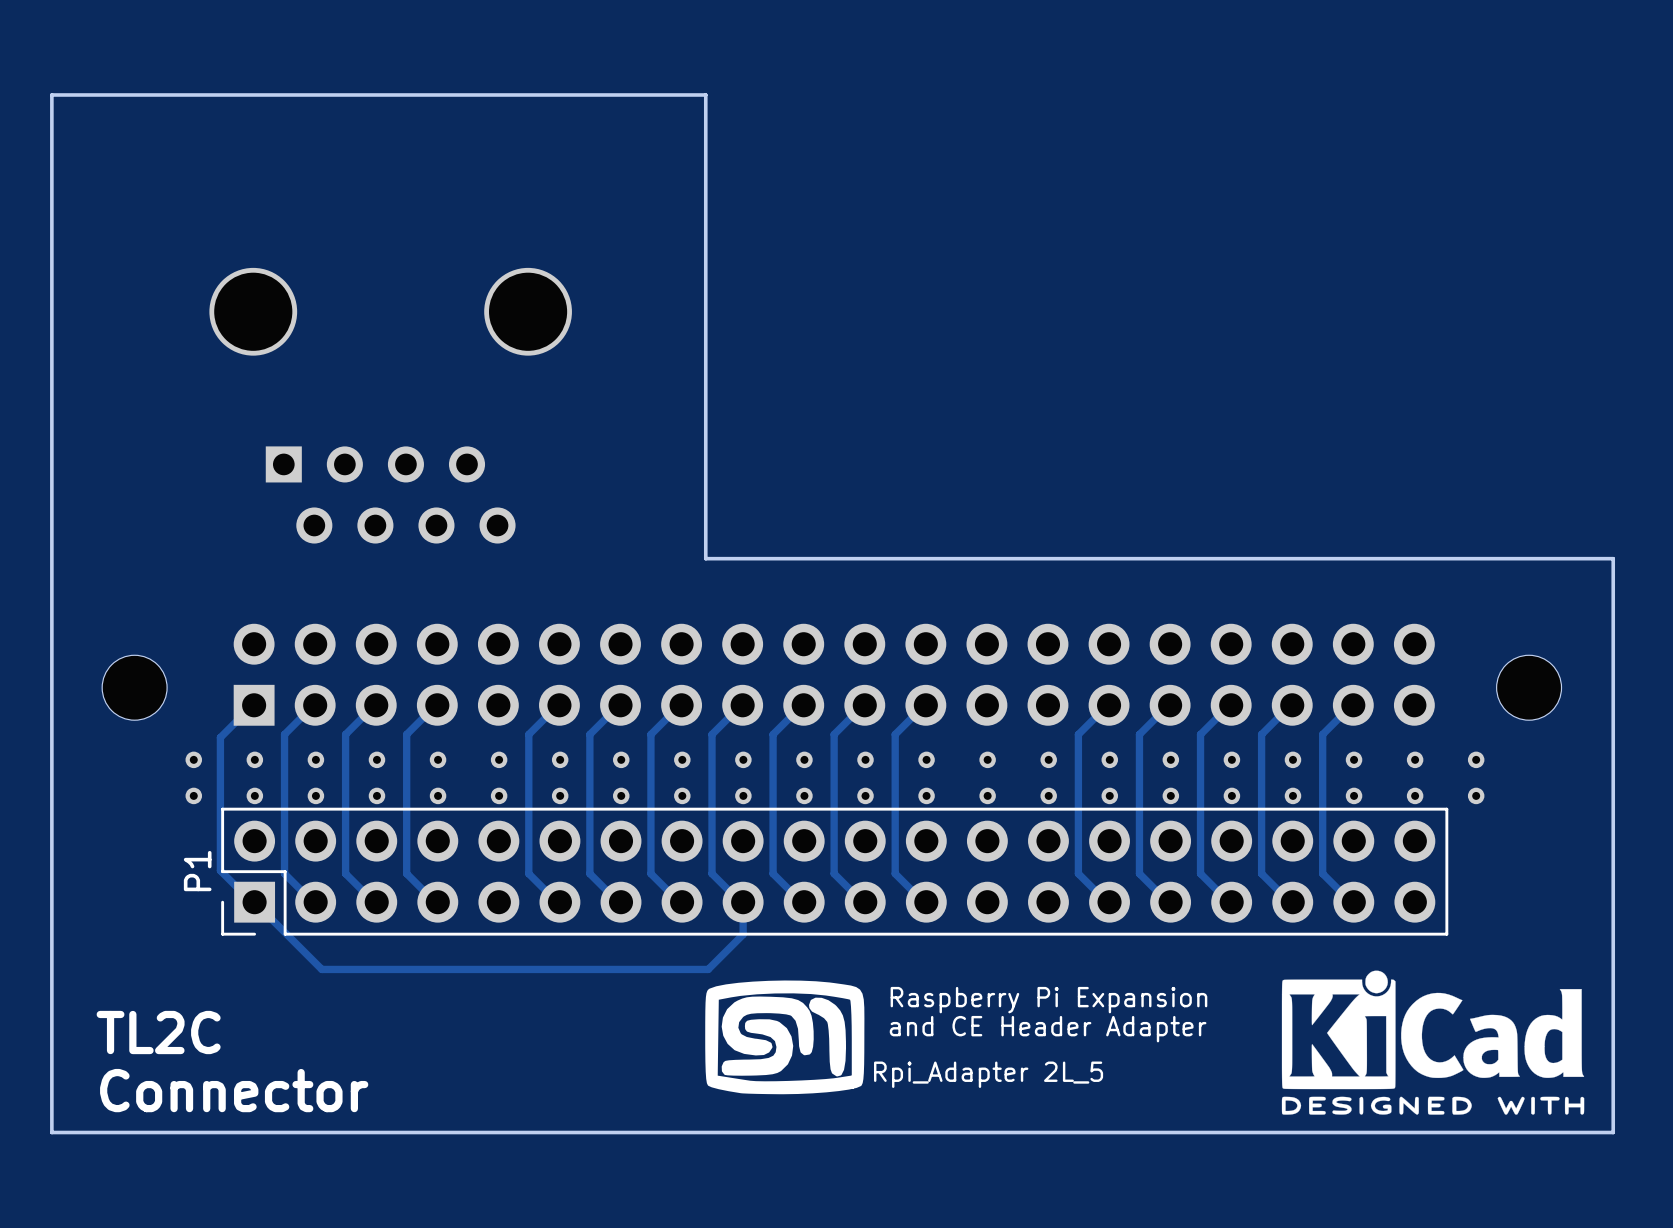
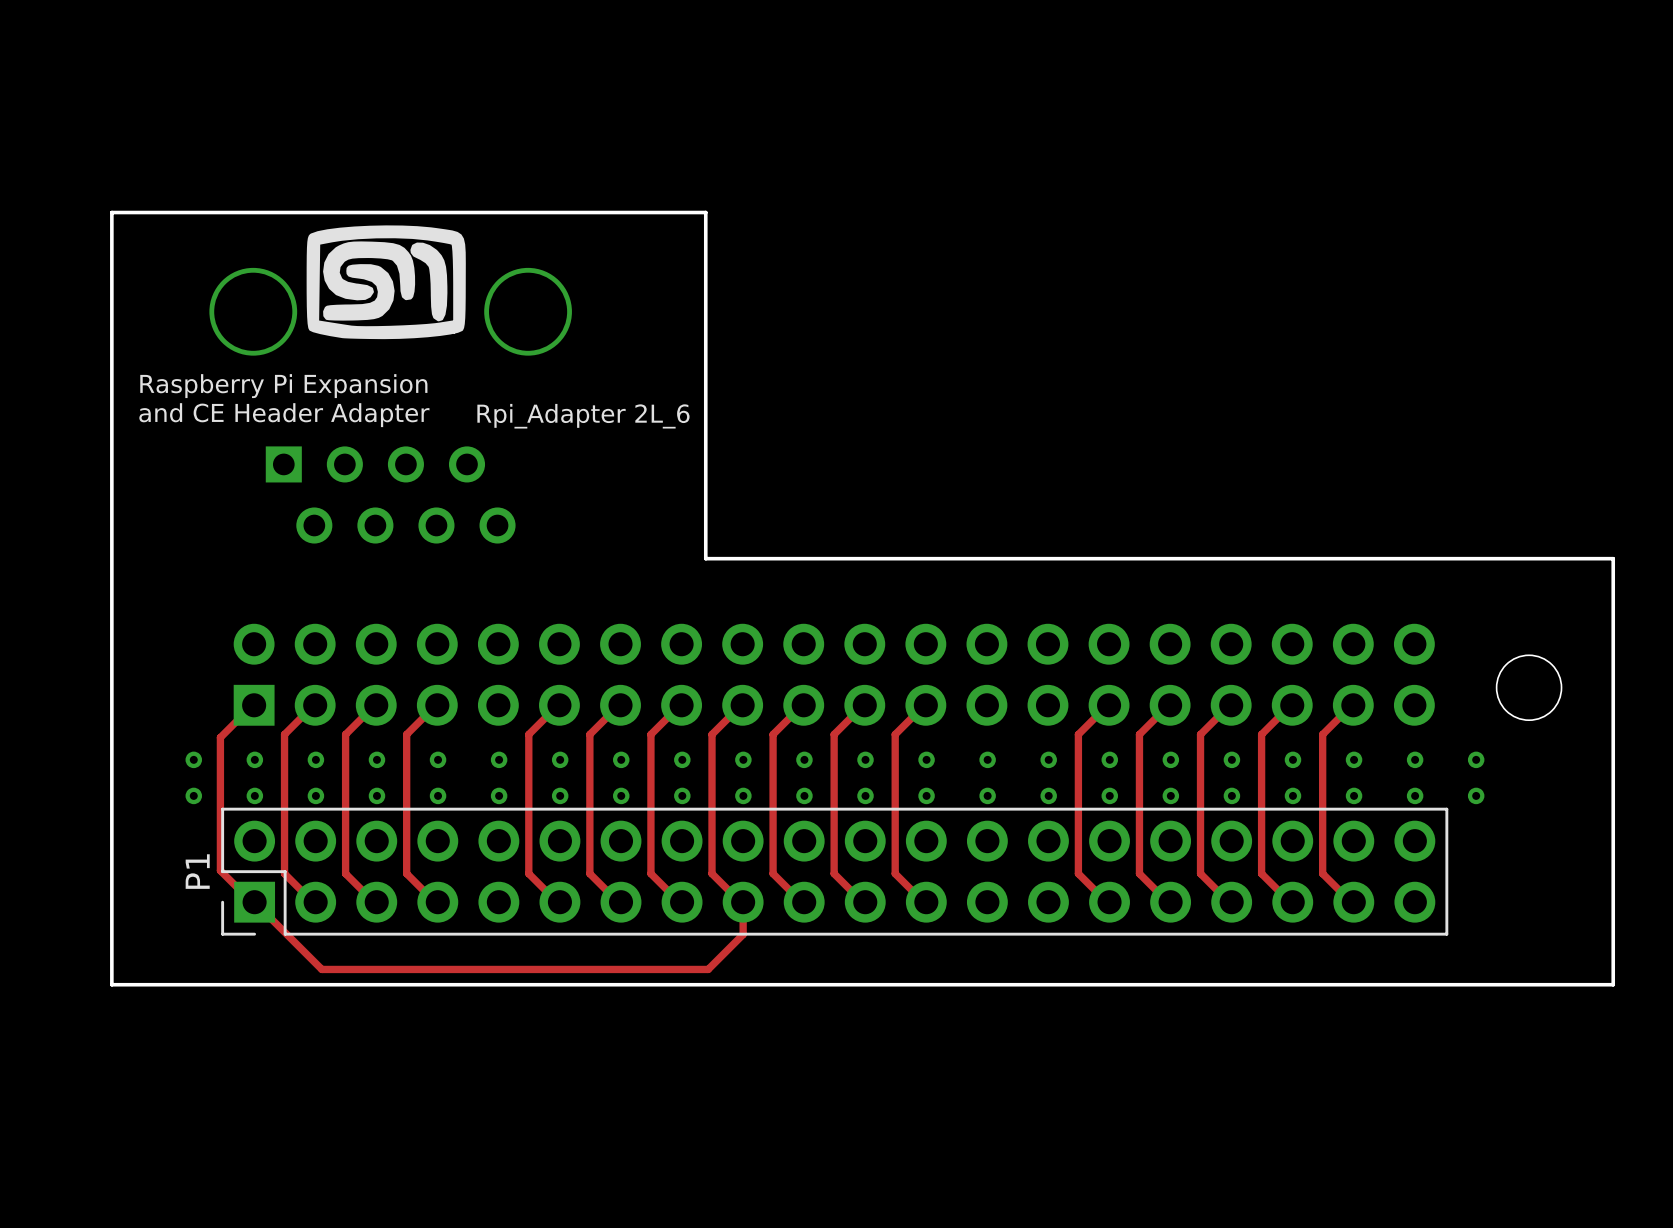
board edge: (705, 212) (705, 94) (51, 94) (51, 1132) (1613, 1132) (1613, 984) -> (705, 212) (111, 212) (111, 984) (1613, 984)
drawing: none -> [306, 225, 466, 340]
text: none -> Raspberry Pi Expansion (283, 386)
text: none -> and CE Header Adapter (284, 415)
text: none -> Rpi_Adapter 2L_6 (583, 416)
part: (134, 687) -> none
drawing: [1281, 970, 1585, 1115] -> none
drawing: [705, 980, 865, 1095] -> none
text: Raspberry Pi Expansion (1048, 1000) -> none
text: and CE Header Adapter (1048, 1029) -> none
text: TL2C (158, 1032) -> none
text: Rpi_Adapter 2L_5 (988, 1074) -> none
text: Connector (234, 1090) -> none

